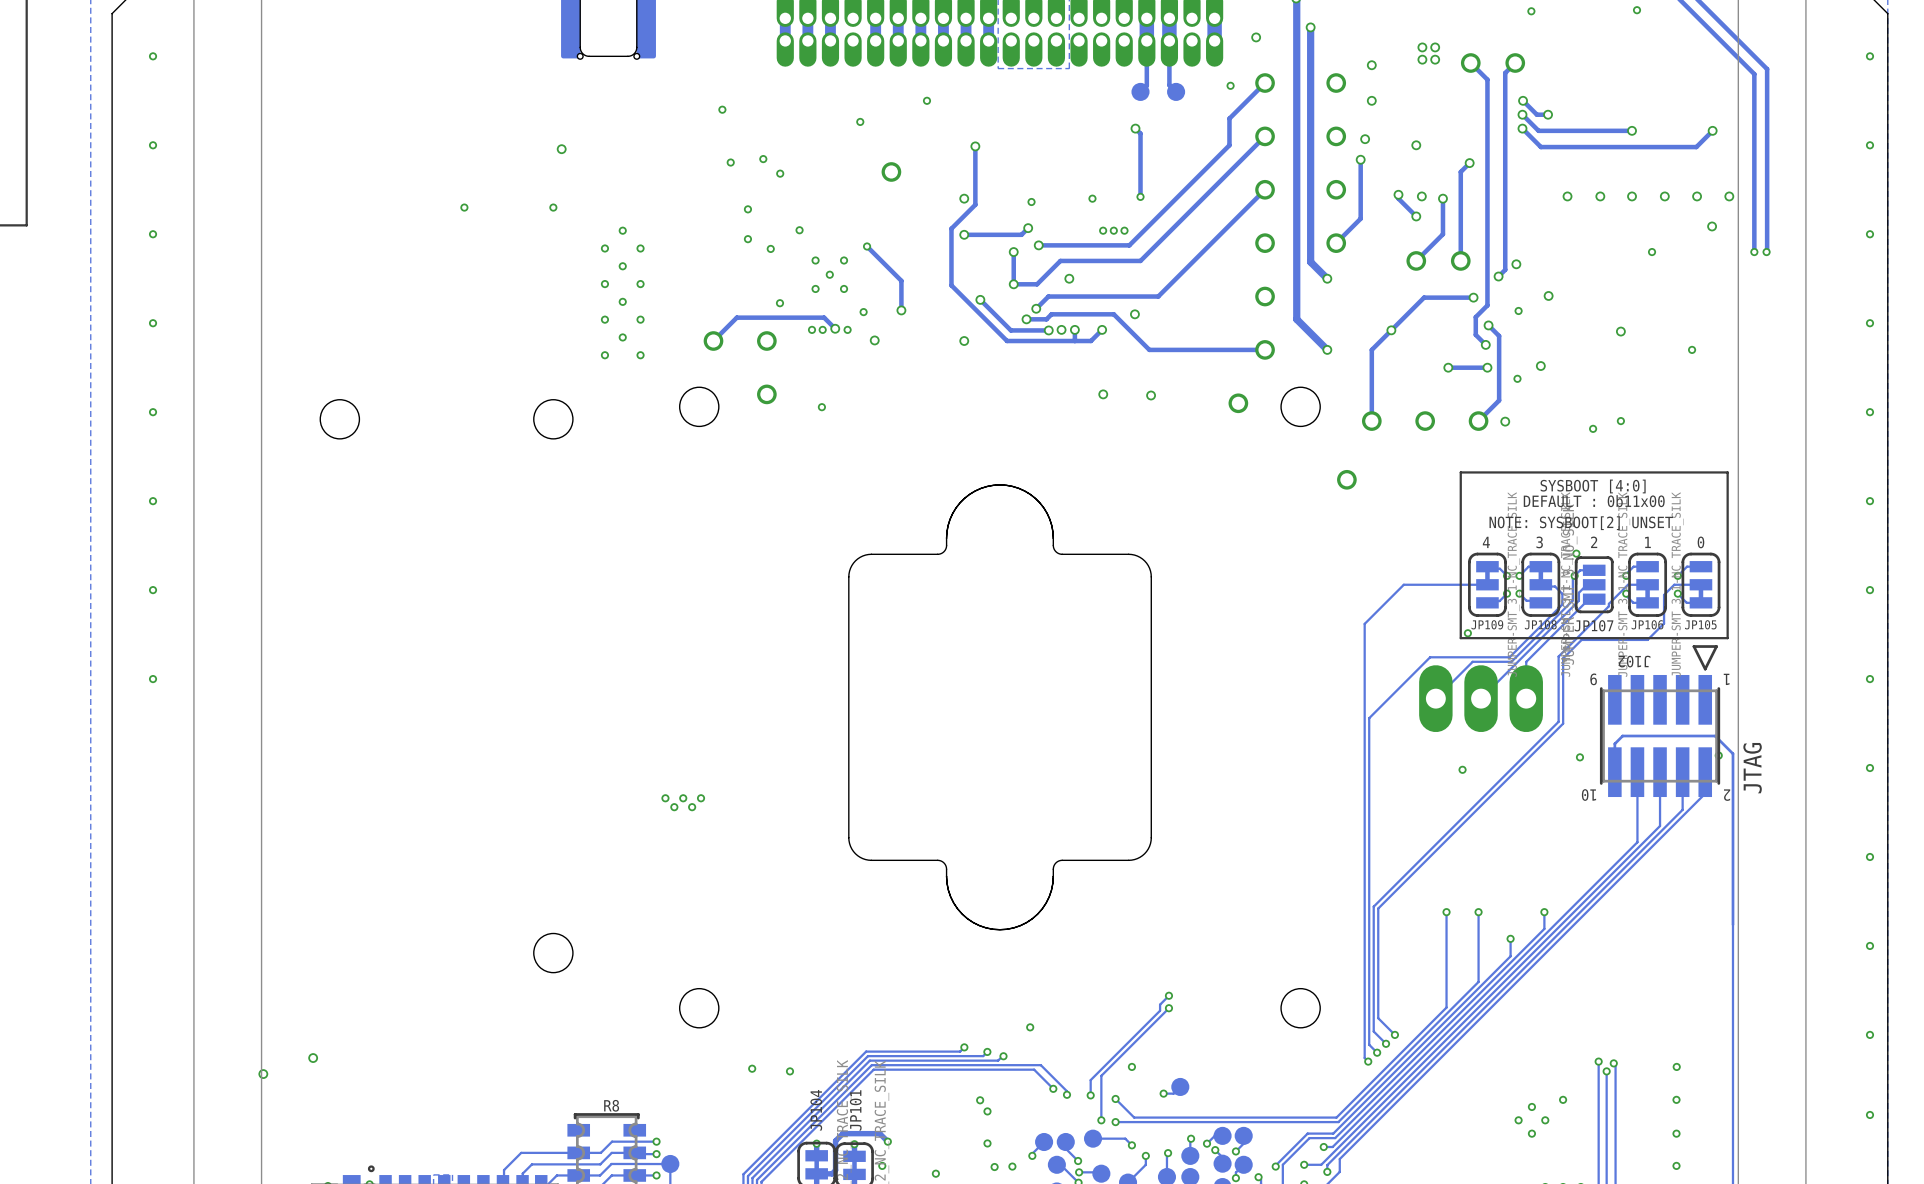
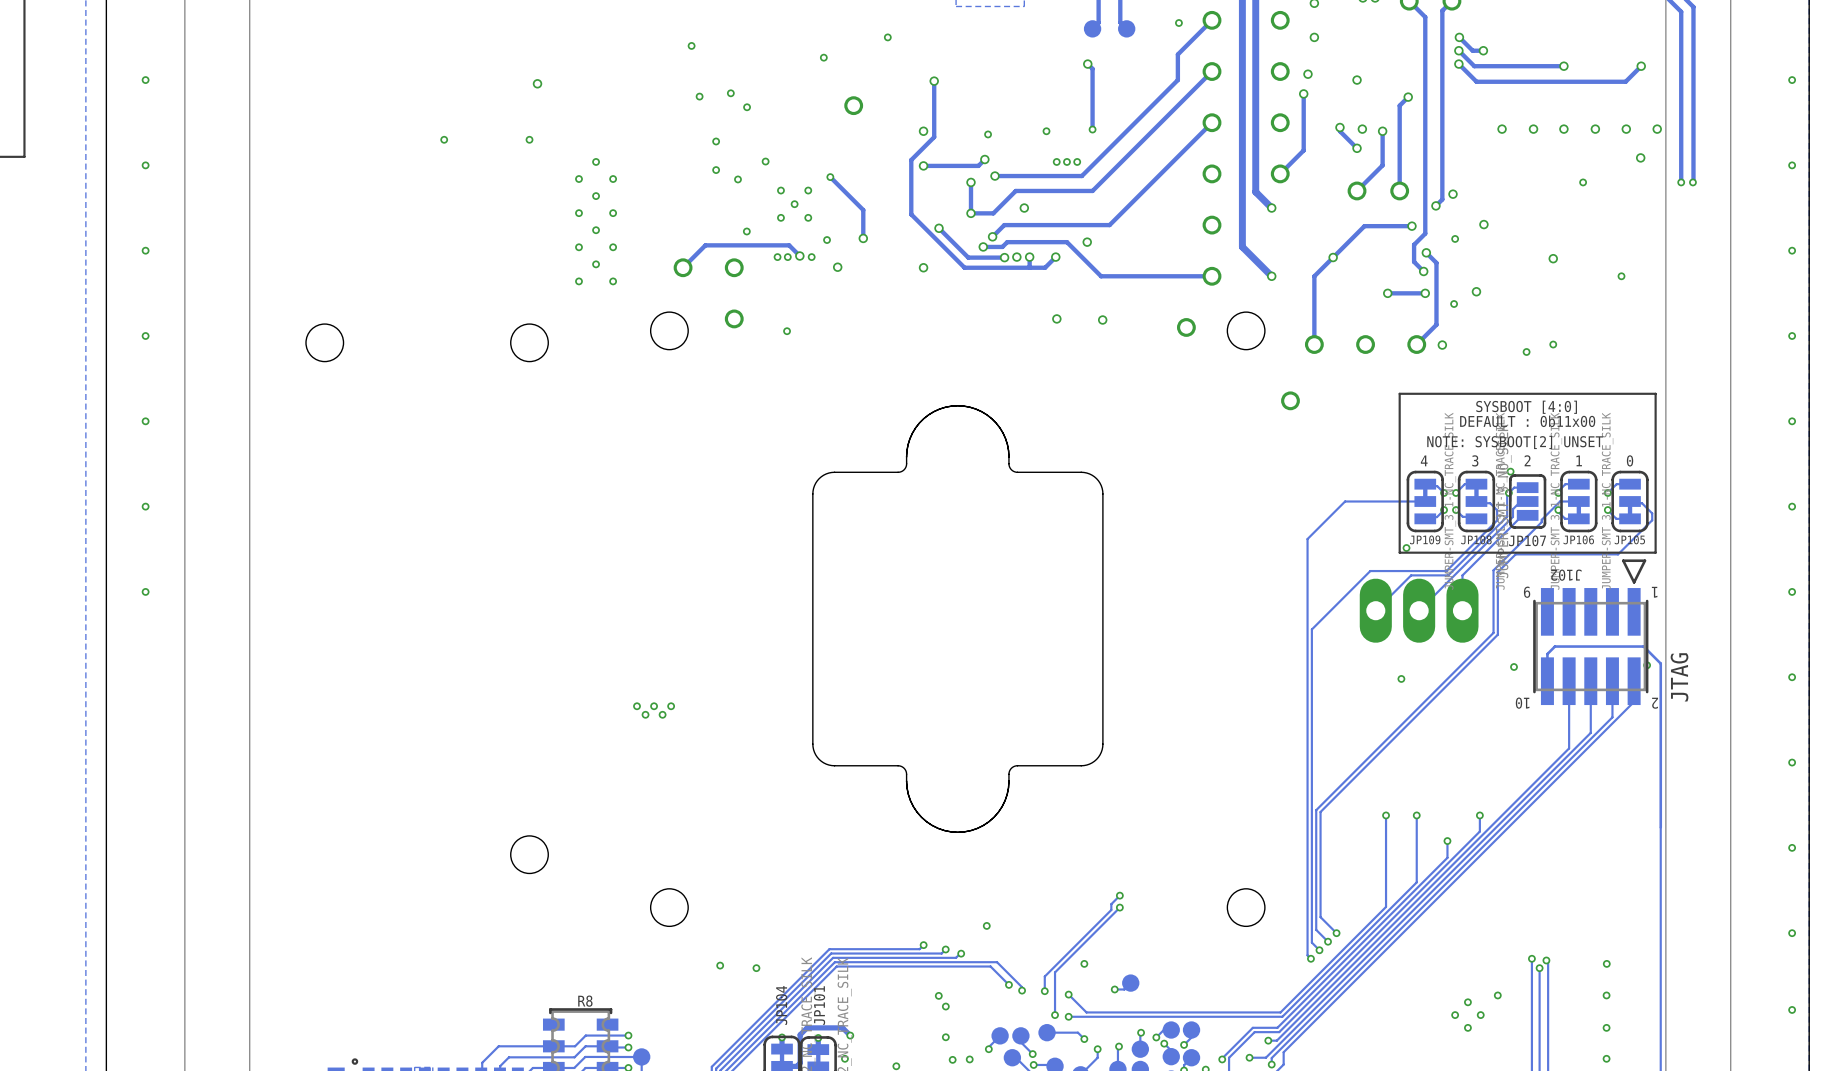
track: (1700, 584) (1674, 584) (1664, 594) (1664, 623) (1647, 639) -> (1630, 501) (1641, 503) (1652, 513) (1652, 520) (1618, 554) (1578, 554)
via: (313, 1058) -> none
via: (263, 1074) -> none

